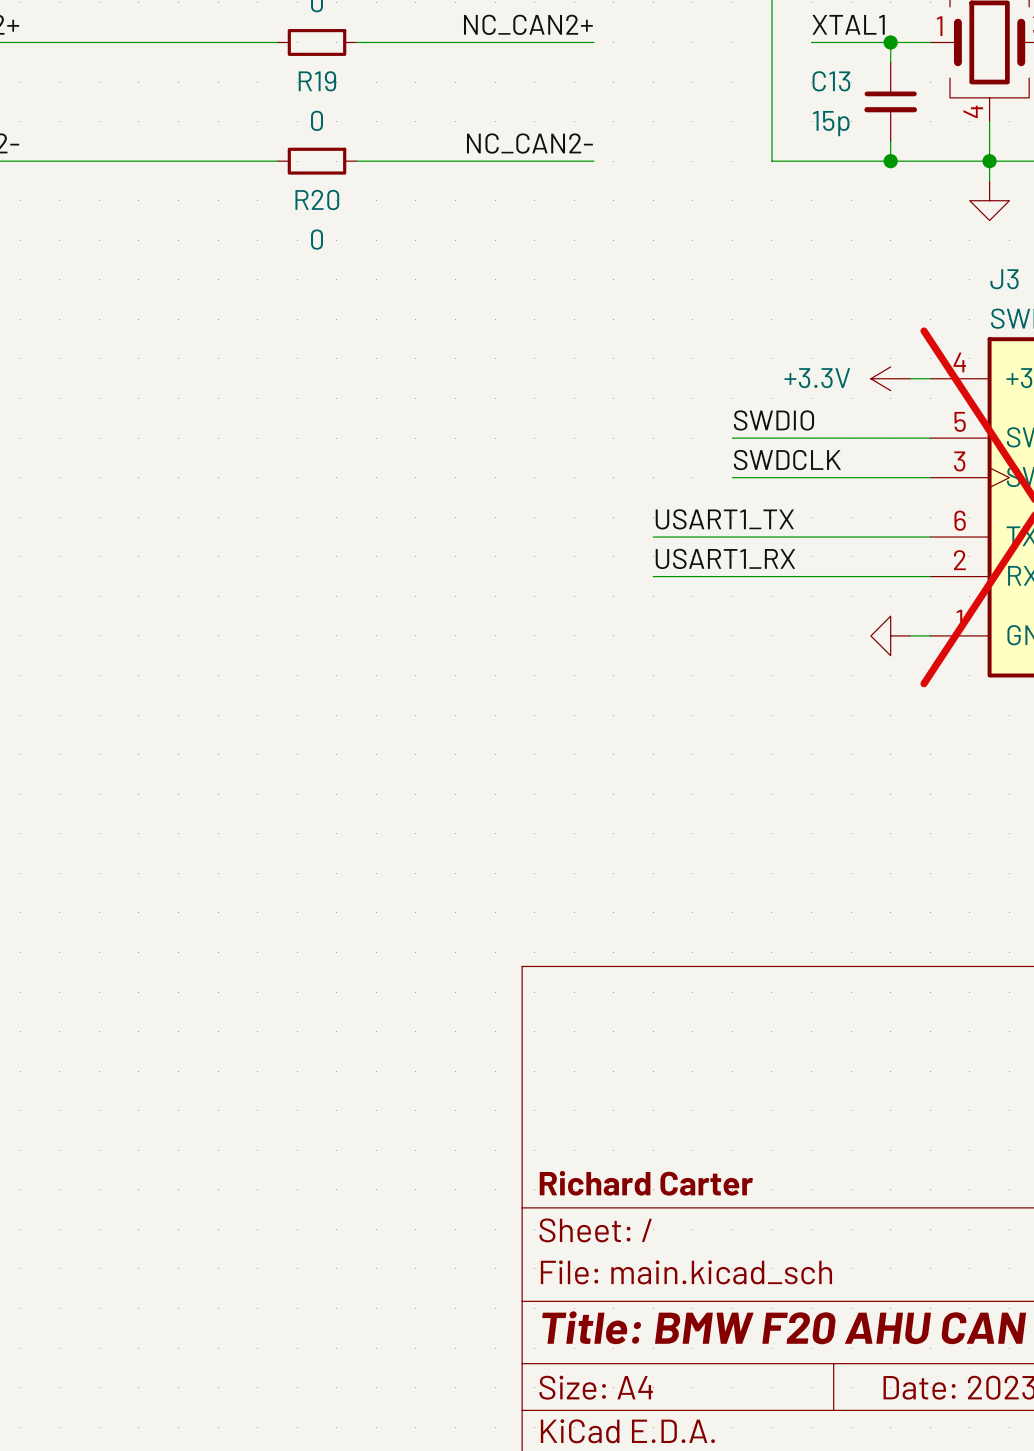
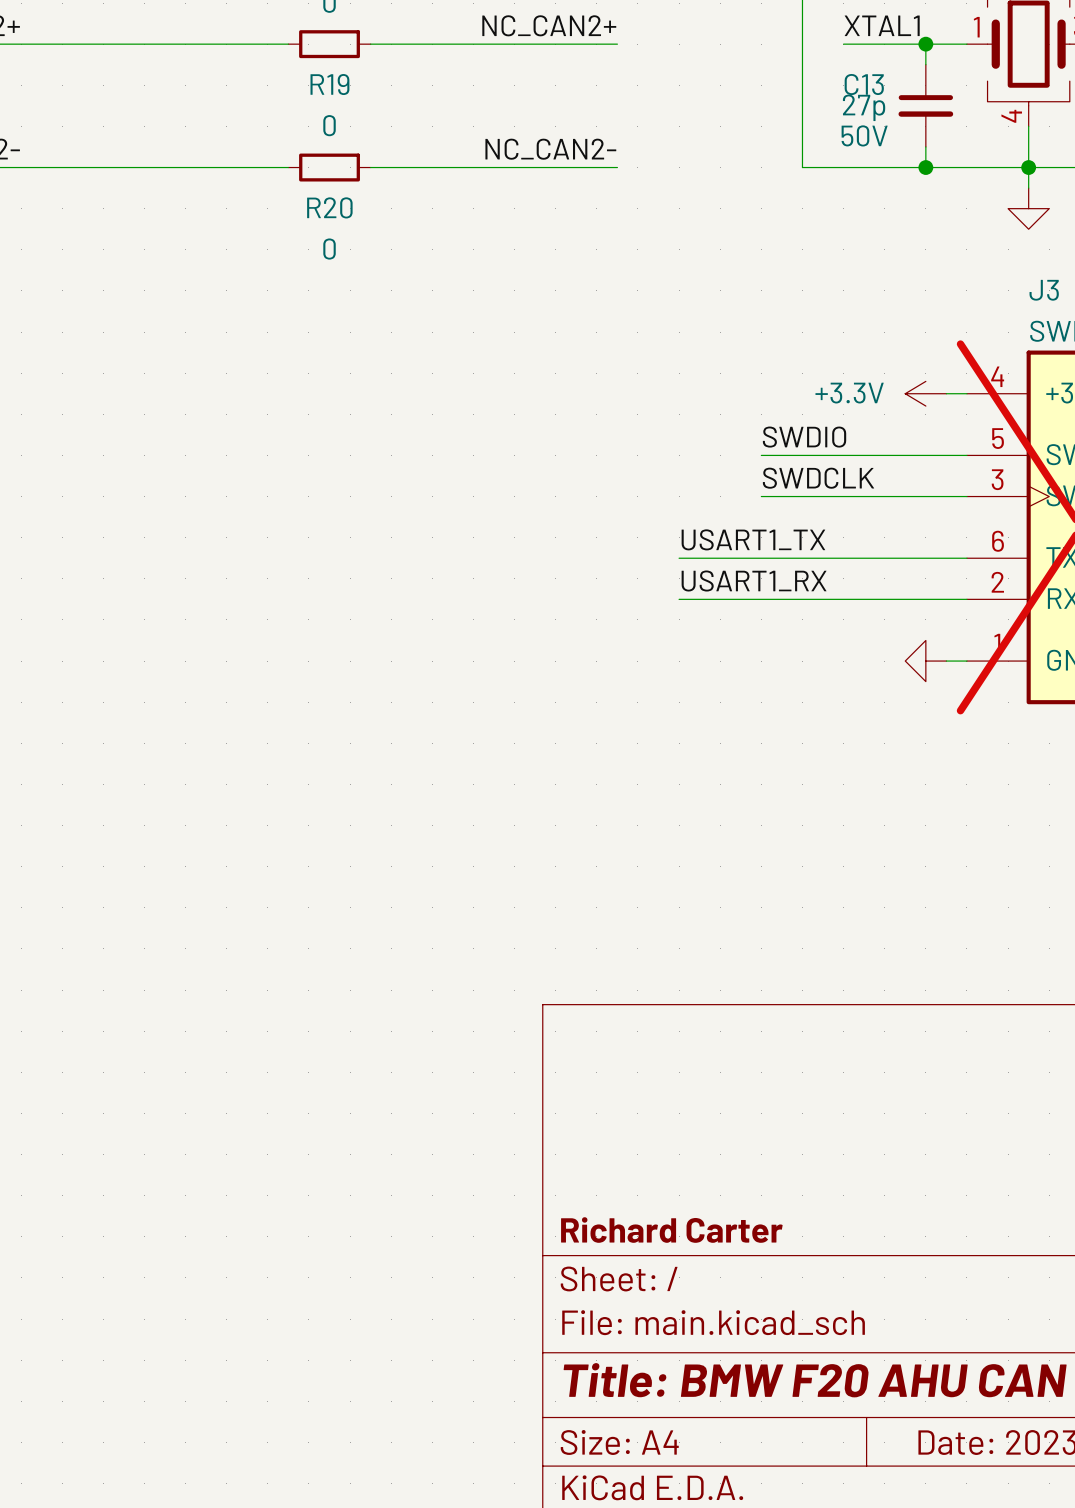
C13 value: 15p (831, 123) -> 27p (864, 107)
C13 text: none -> 50V (864, 135)

